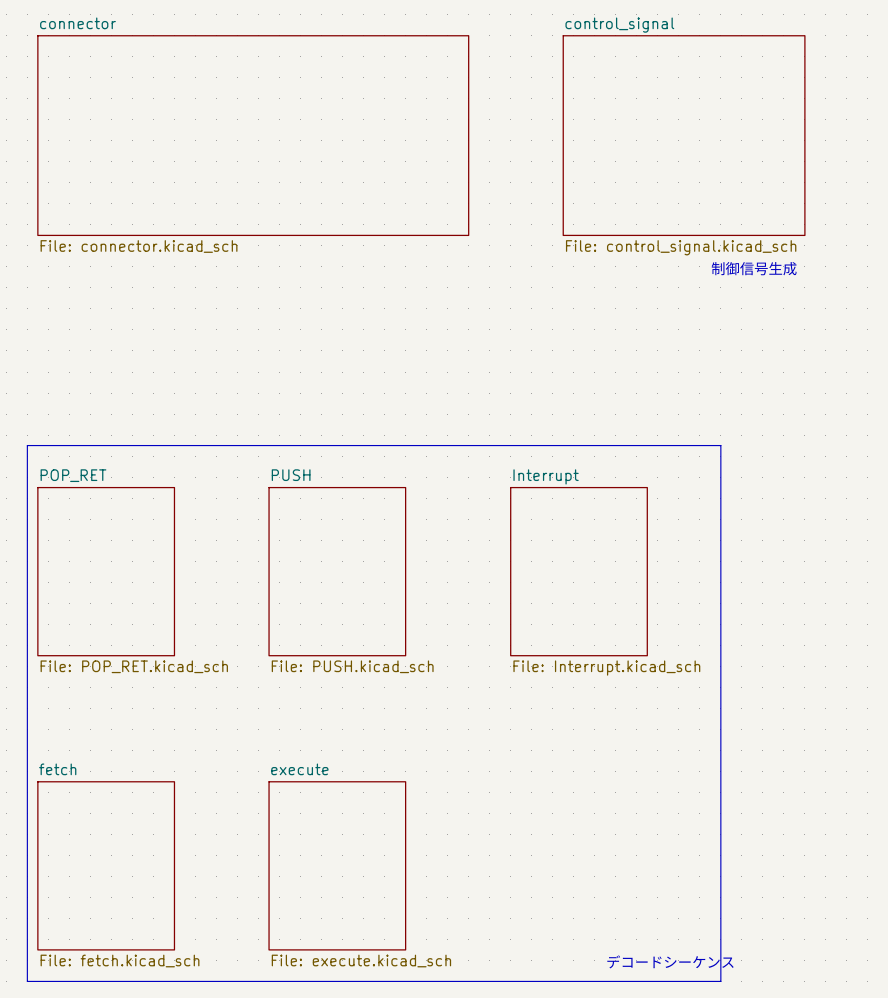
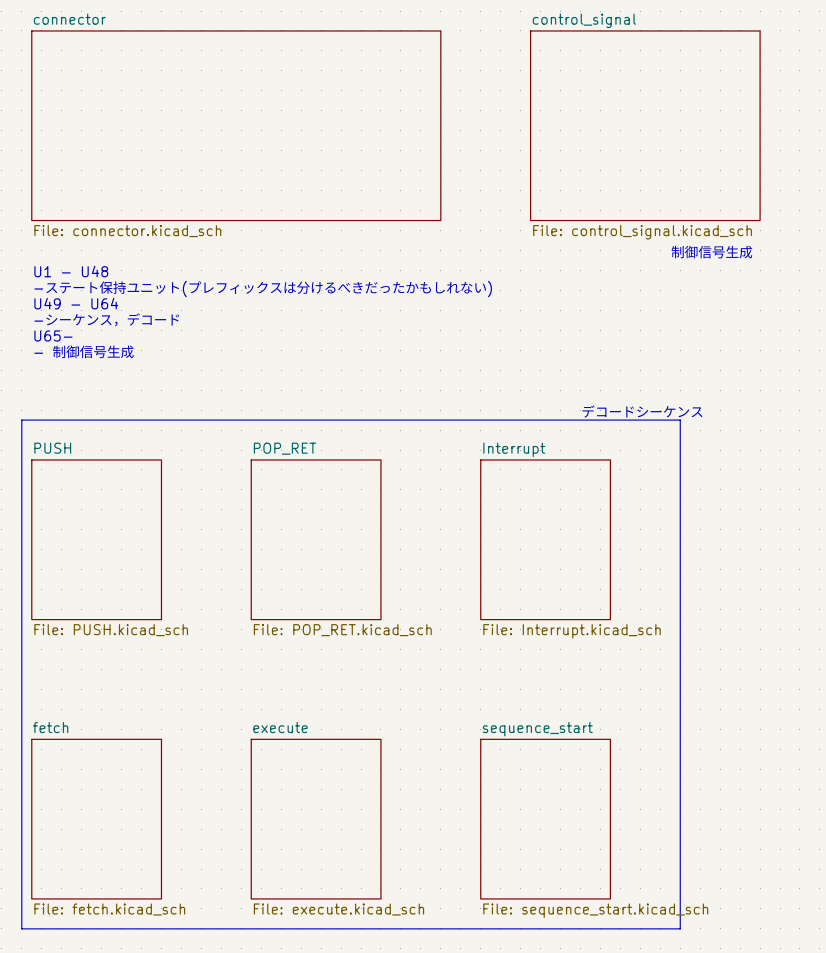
text: none -> U1 - U48 (71, 271)
text: none -> -ステート保持ユニット(プレフィックスは分けるべきだったかもしれない) (263, 288)
text: none -> U49 - U64 (76, 303)
text: none -> -シーケンス，デコード (107, 319)
text: none -> U65- (53, 335)
text: none -> - 制御信号生成 (84, 351)
text: none -> デコードシーケンス (642, 411)
sheet POP_RET name: POP_RET (73, 475) -> PUSH (52, 448)
sheet PUSH name: PUSH (291, 475) -> POP_RET (285, 448)
sheet POP_RET value: File: POP_RET.kicad_sch (134, 666) -> File: PUSH.kicad_sch (111, 630)
sheet PUSH value: File: PUSH.kicad_sch (352, 666) -> File: POP_RET.kicad_sch (342, 630)
sheet sequence_start: none -> File: sequence_start.kicad_sch (545, 819)
text: デコードシーケンス (670, 961) -> none

